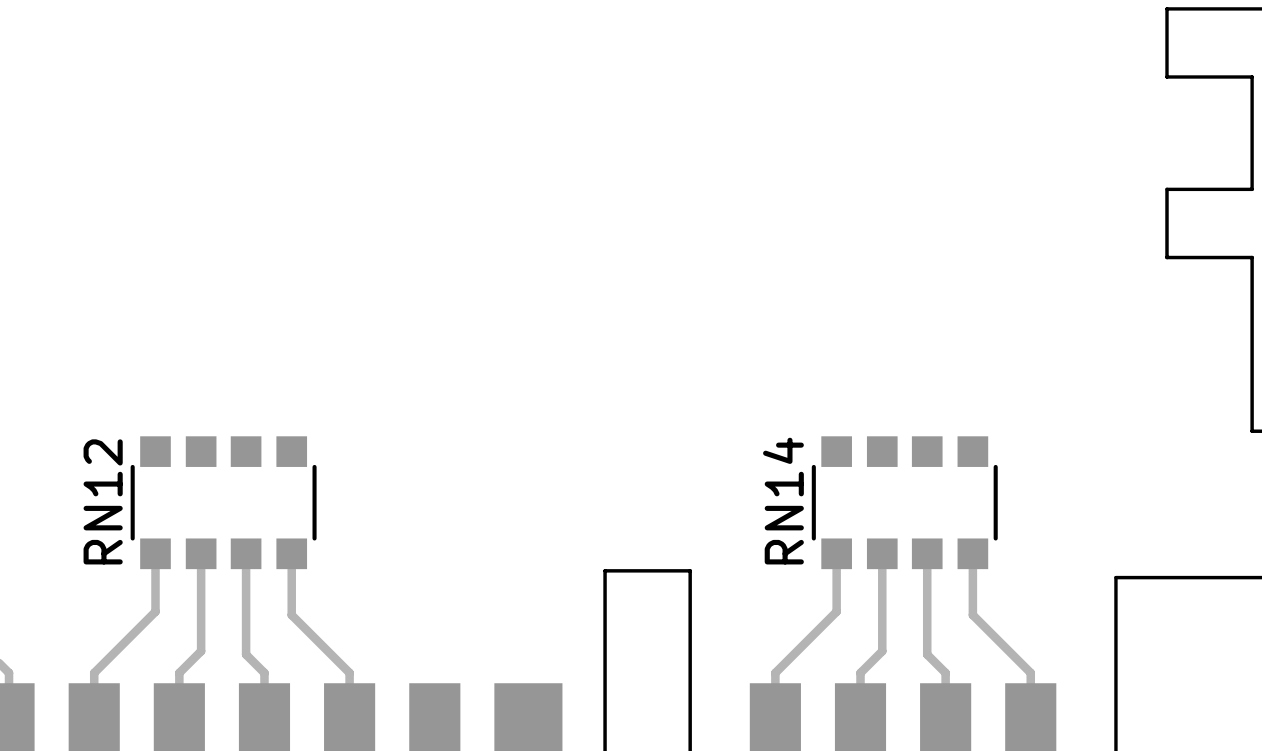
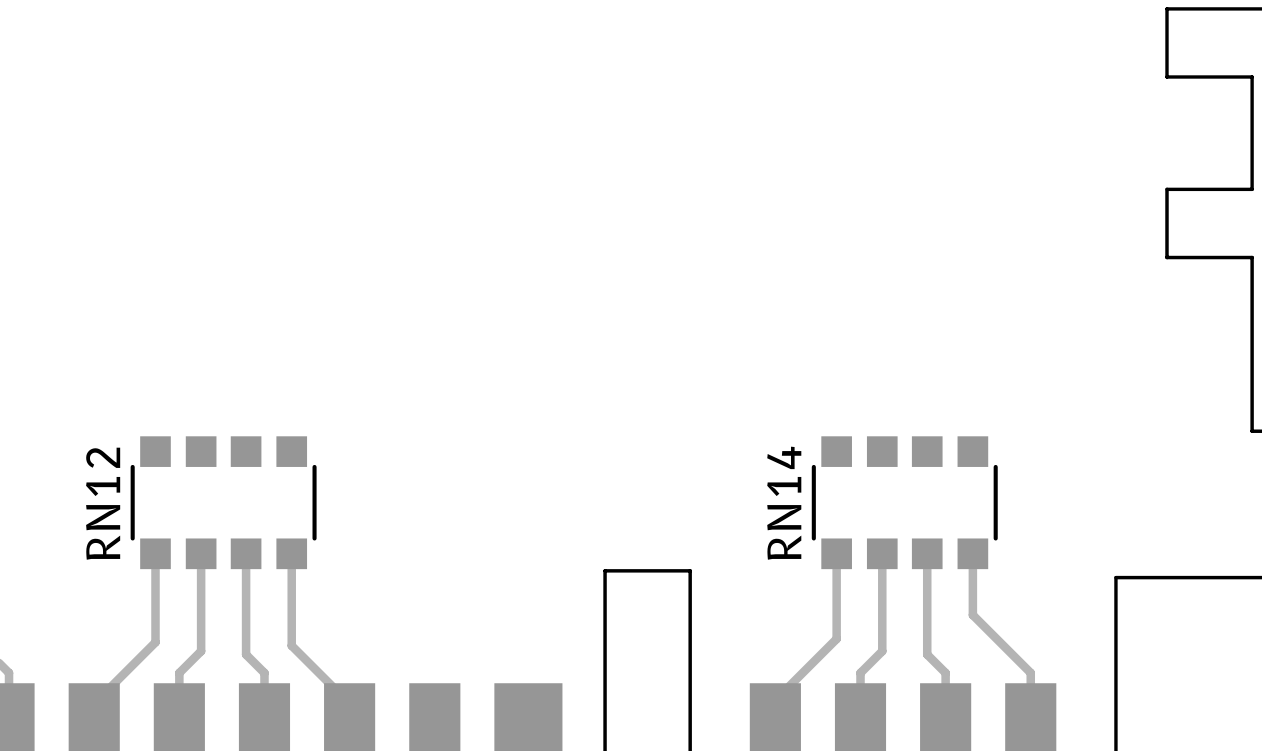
track: (155, 611) (94, 672) (94, 703) -> (155, 611) (155, 642) (94, 703)
track: (836, 611) (775, 672) (775, 700) -> (836, 611) (836, 638) (775, 700)
track: (291, 615) (349, 672) (349, 703) -> (291, 615) (291, 645) (349, 703)

